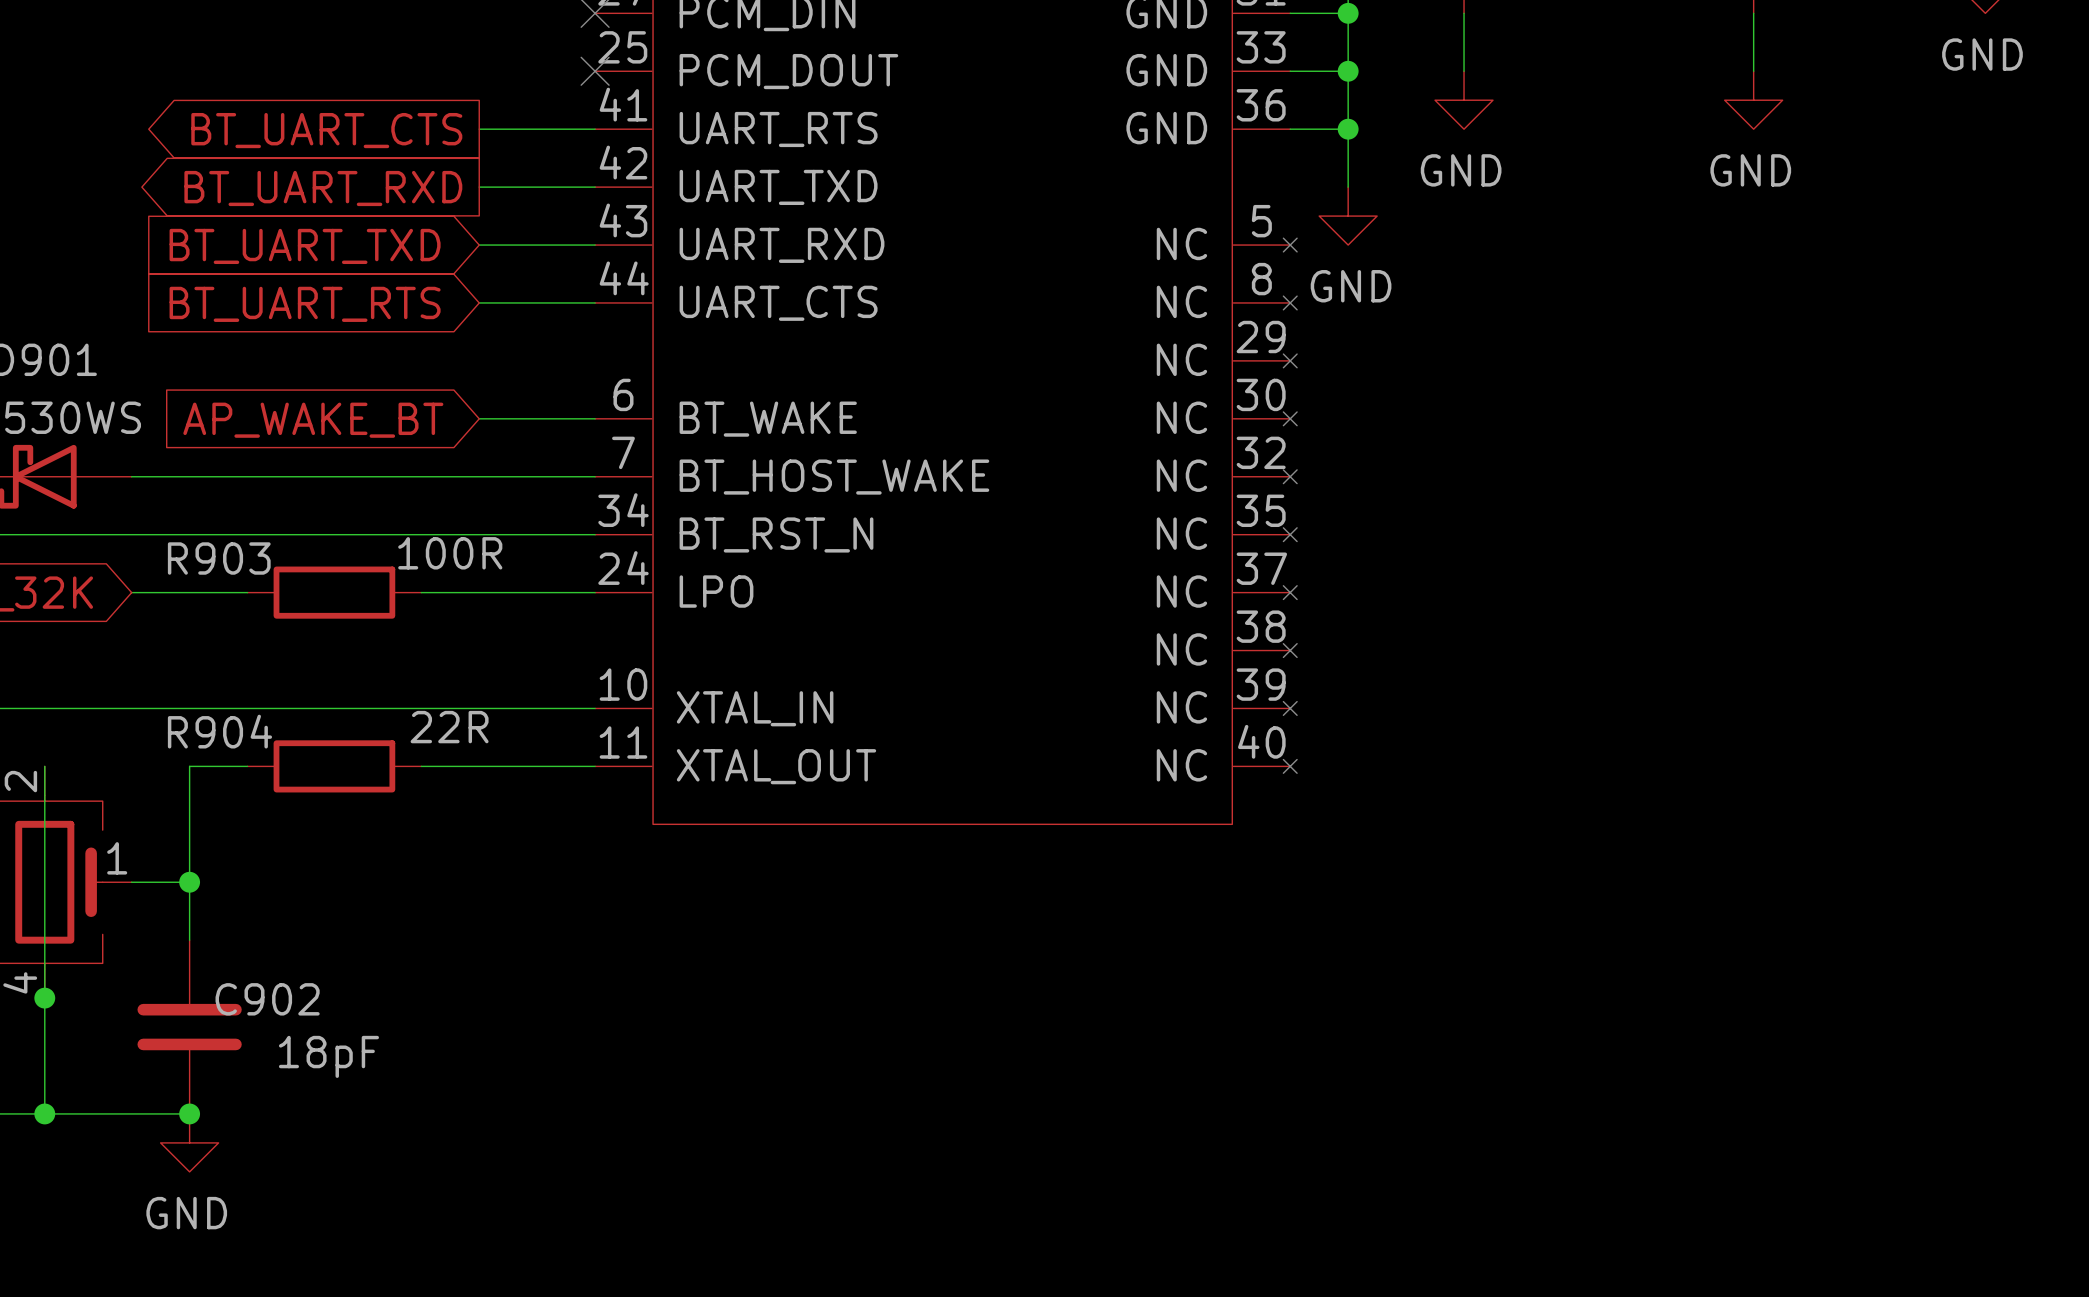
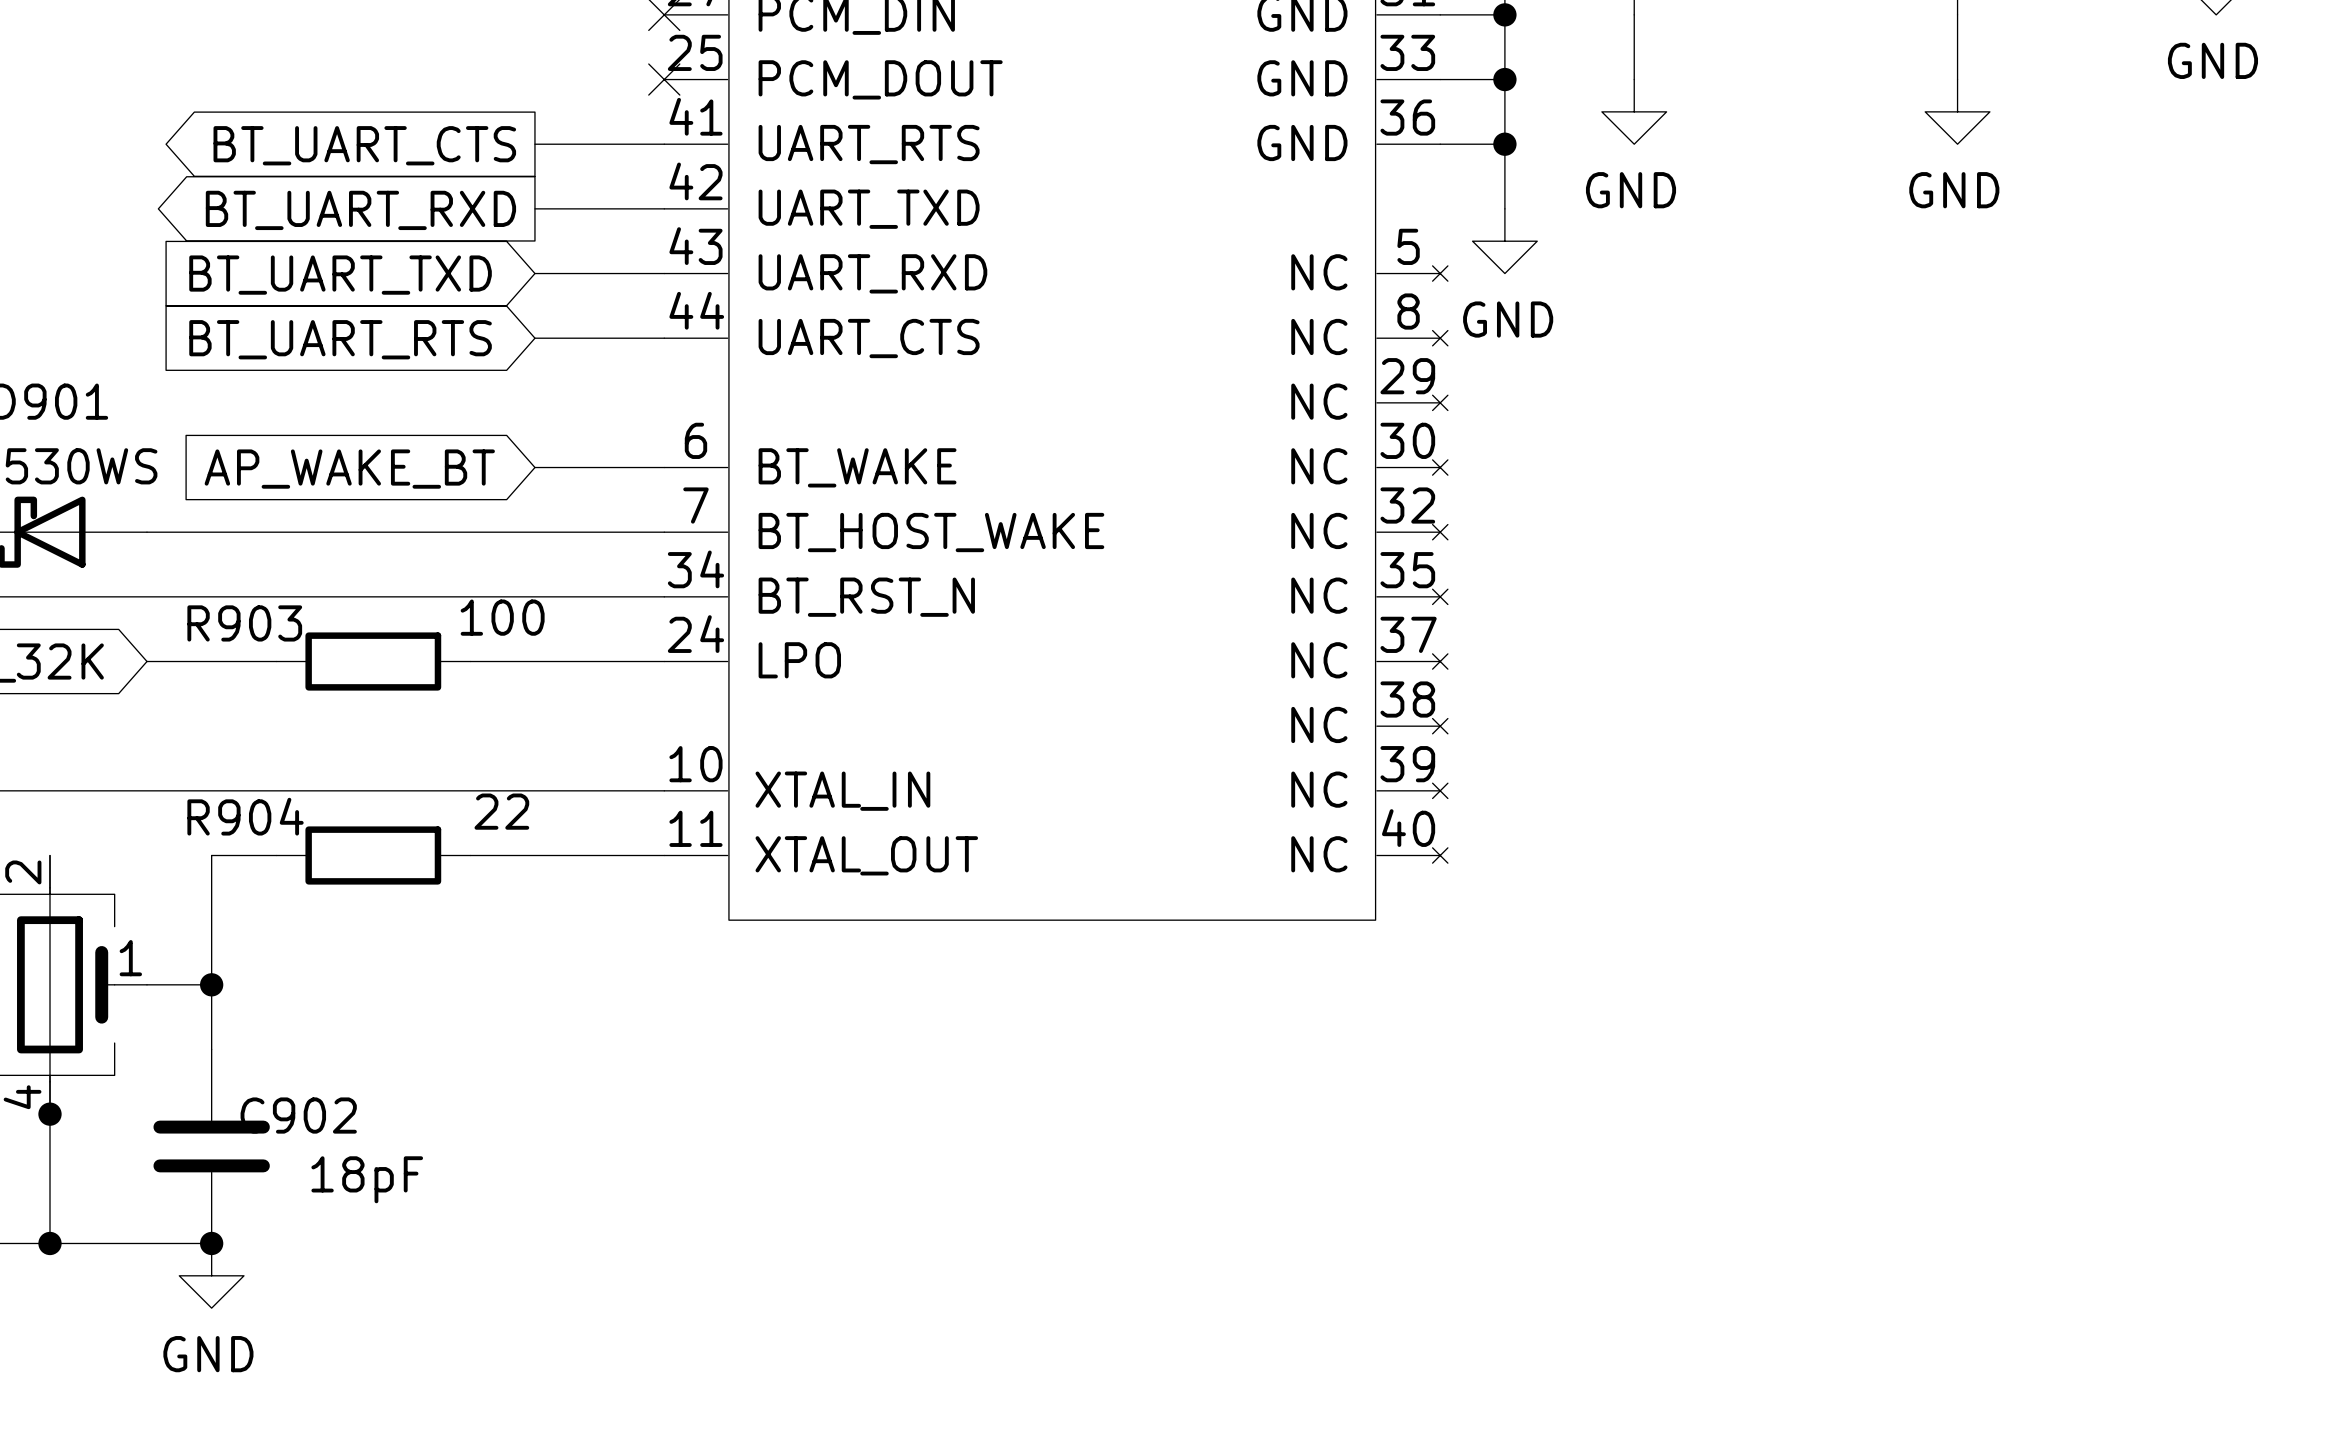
R903 value: 100R (450, 553) -> 100 (502, 617)
R904 value: 22R (449, 727) -> 22 (501, 811)

